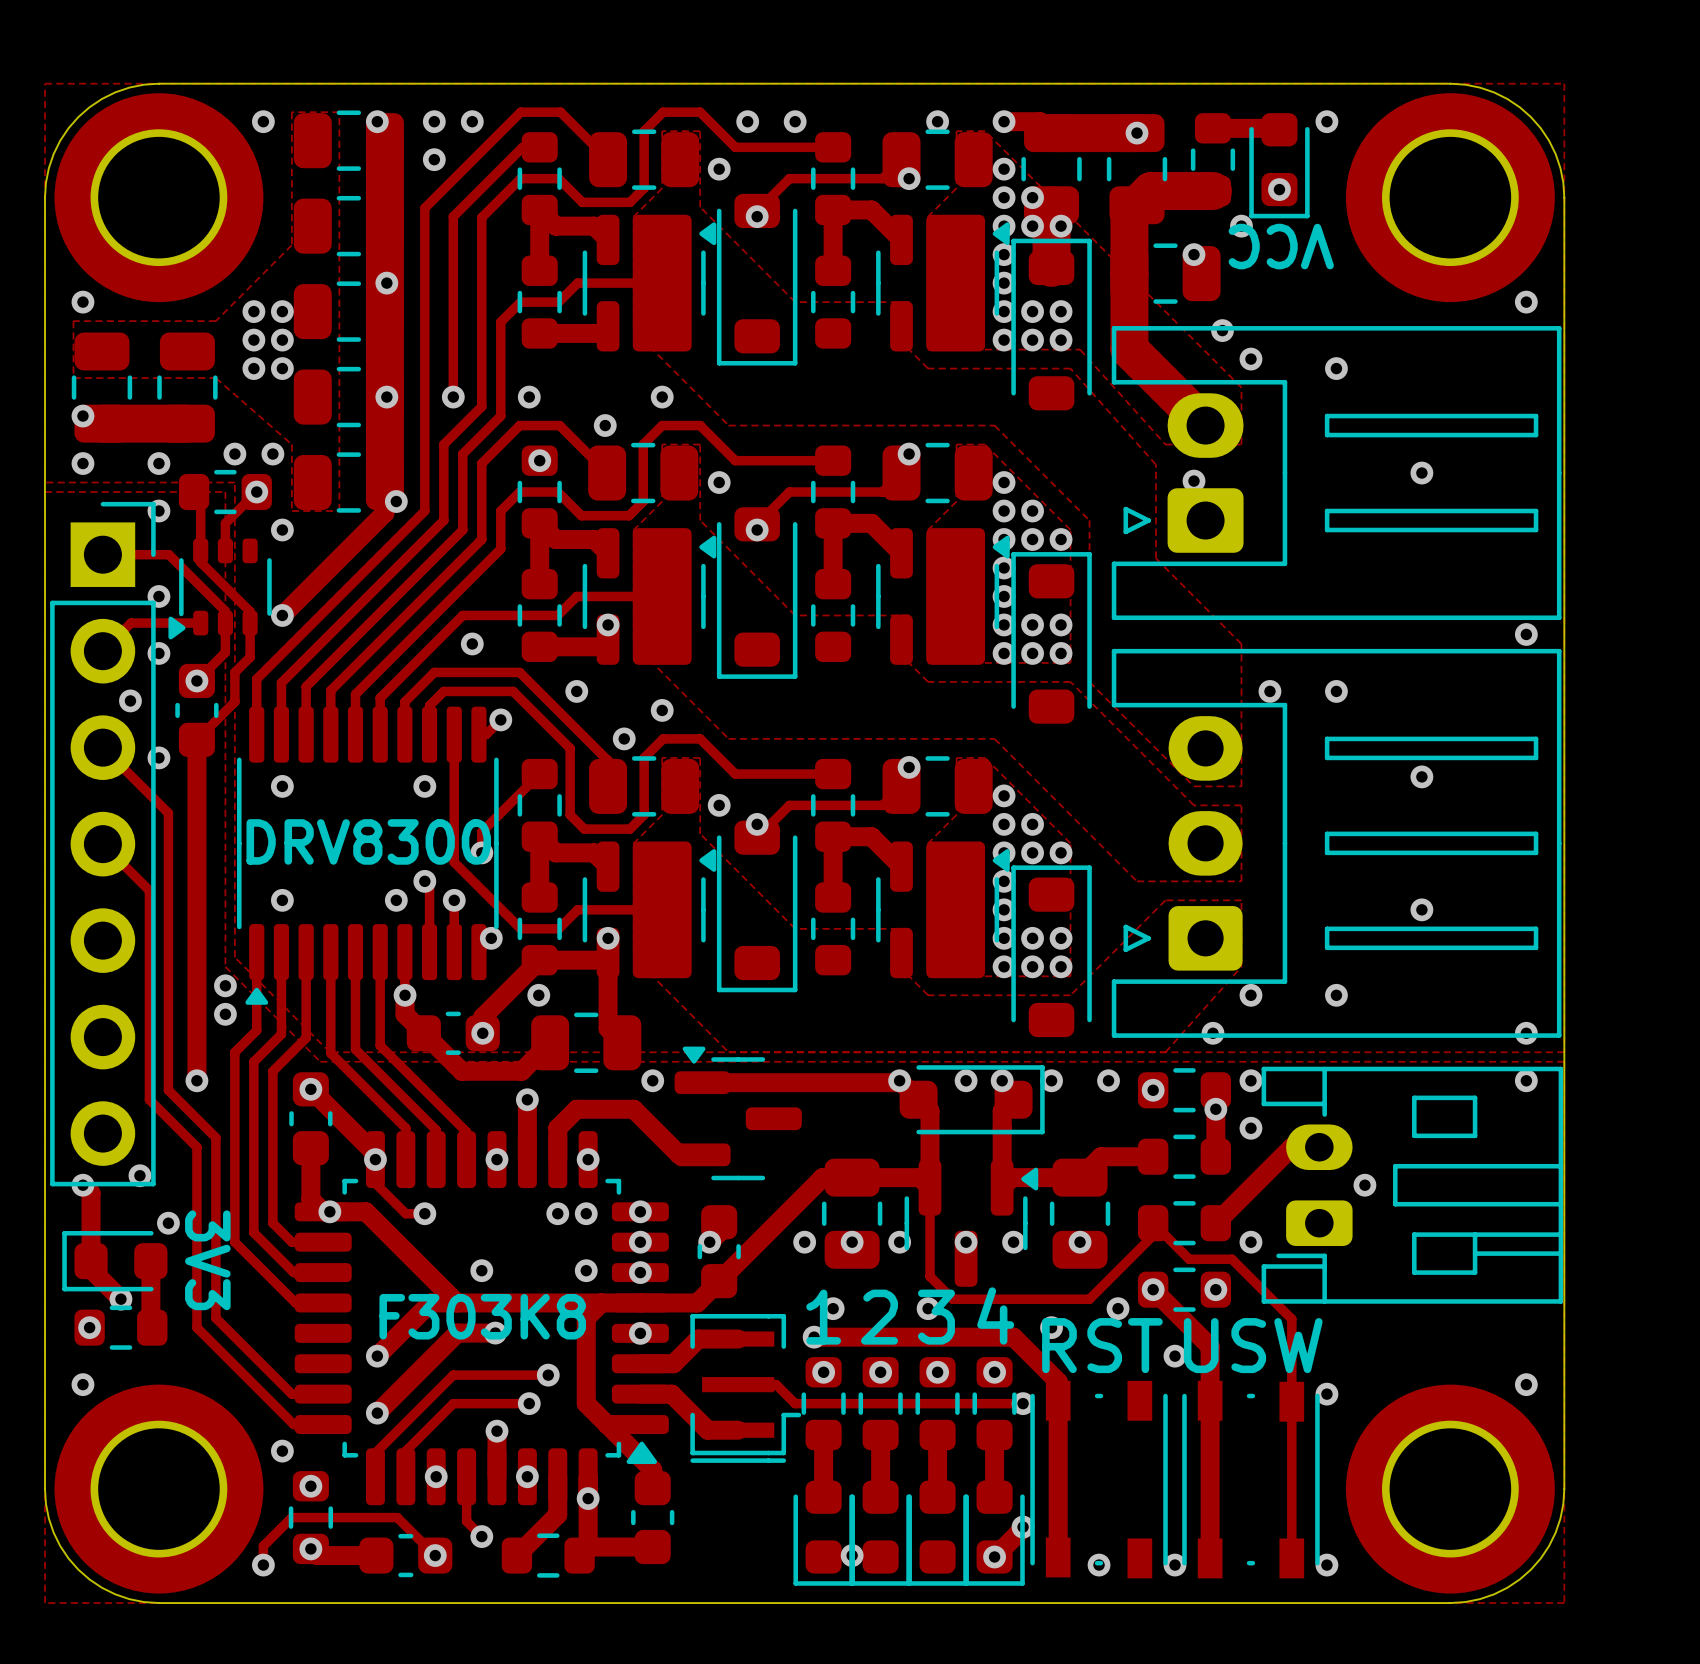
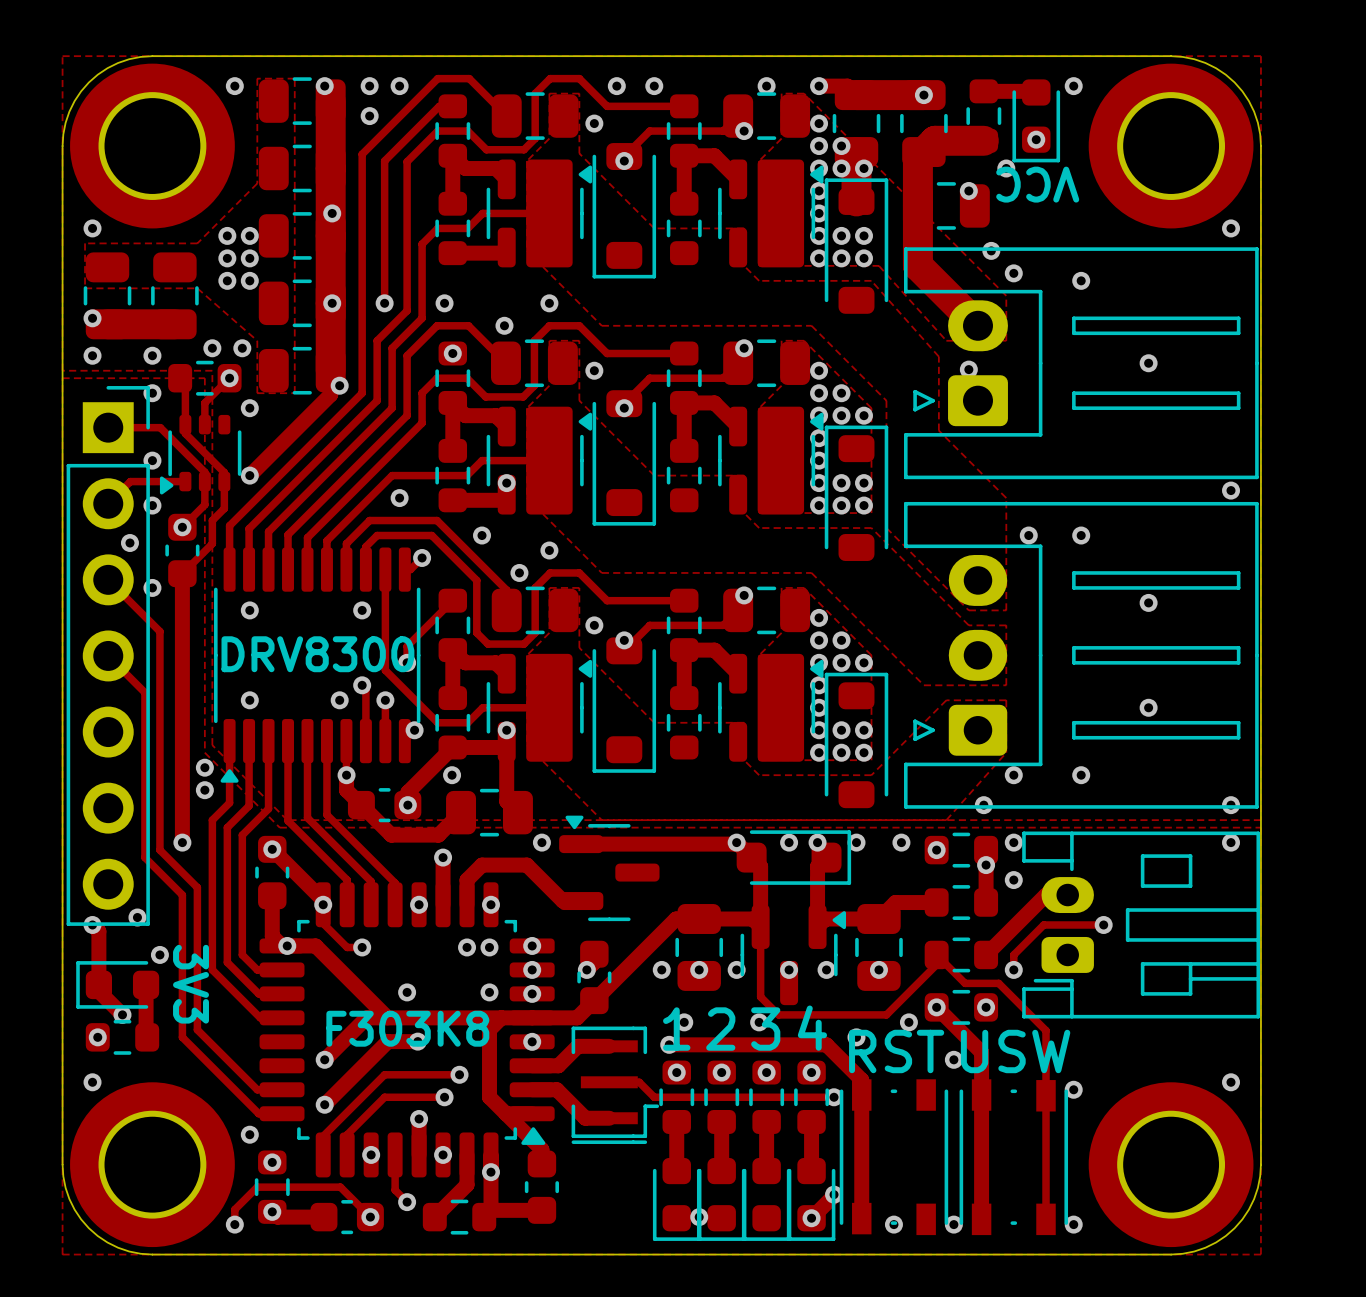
track: none -> (1103, 924) (1043, 924) (1013, 954) (1013, 969)

